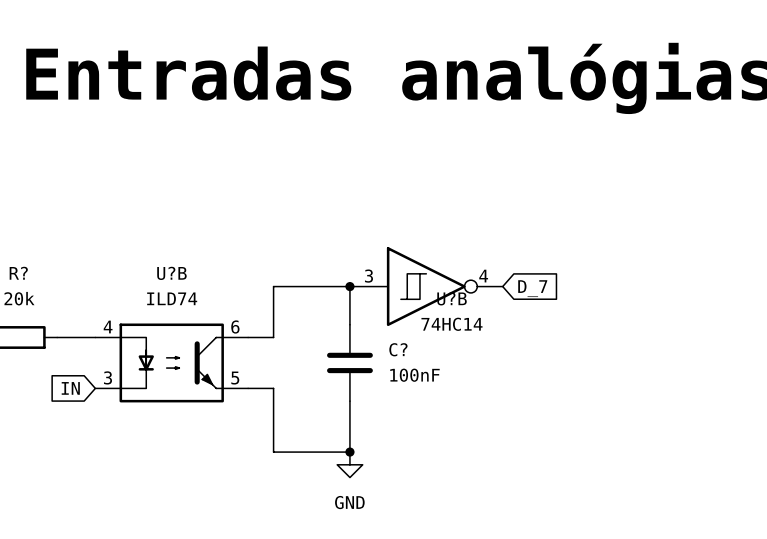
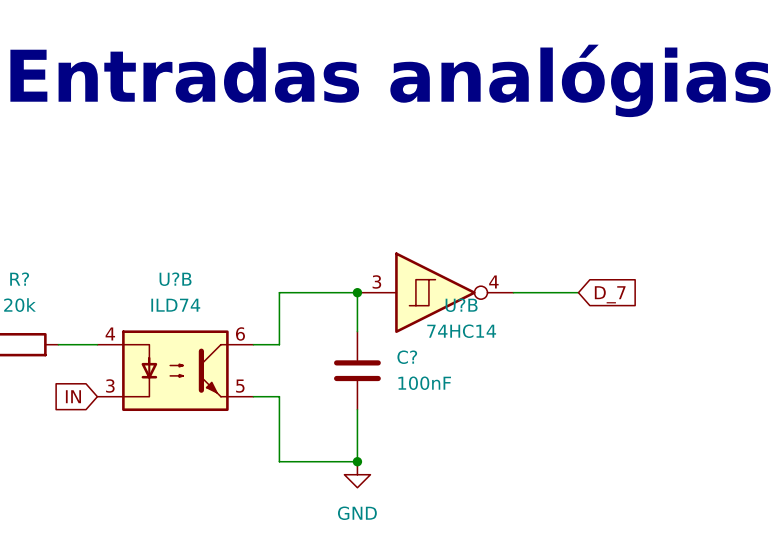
wire: none -> (513, 292) (578, 292)
global label position: D_7 (532, 288) -> D_7 (610, 294)

